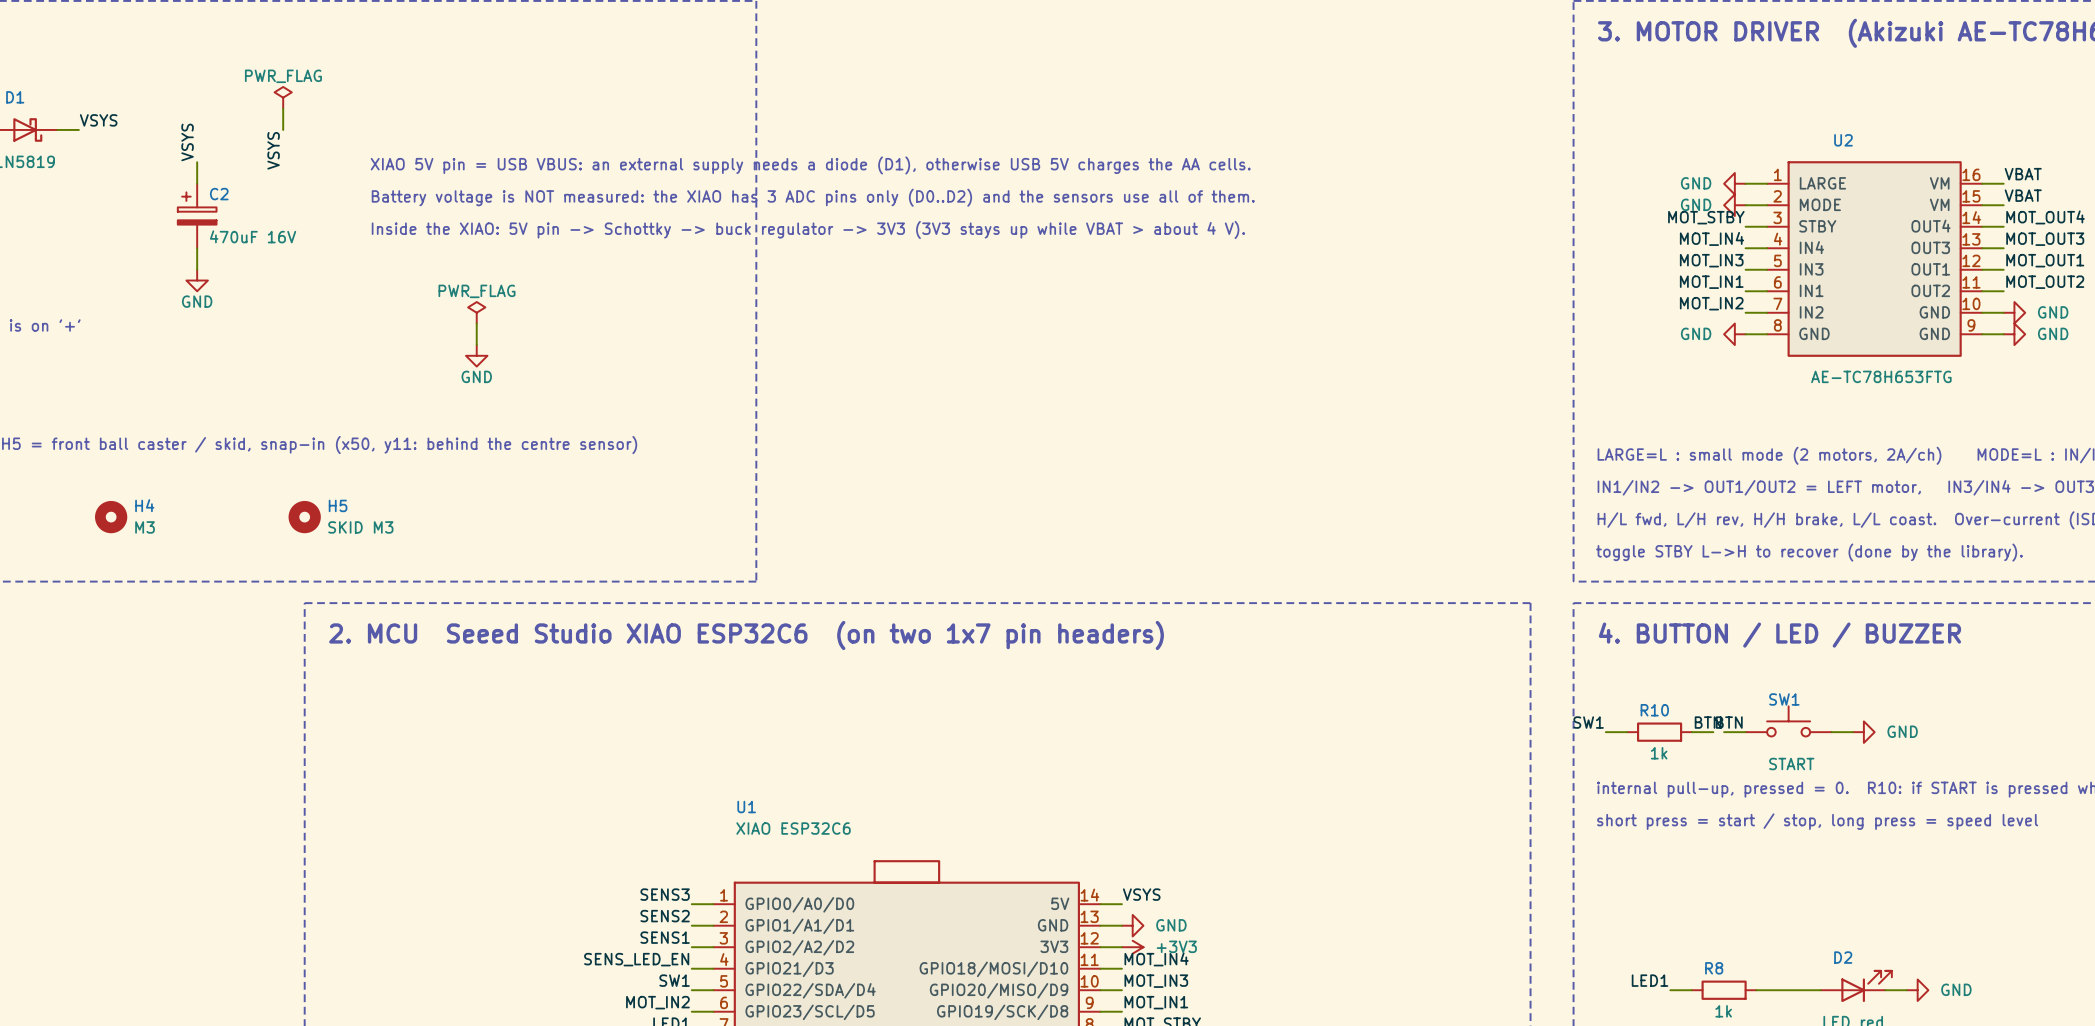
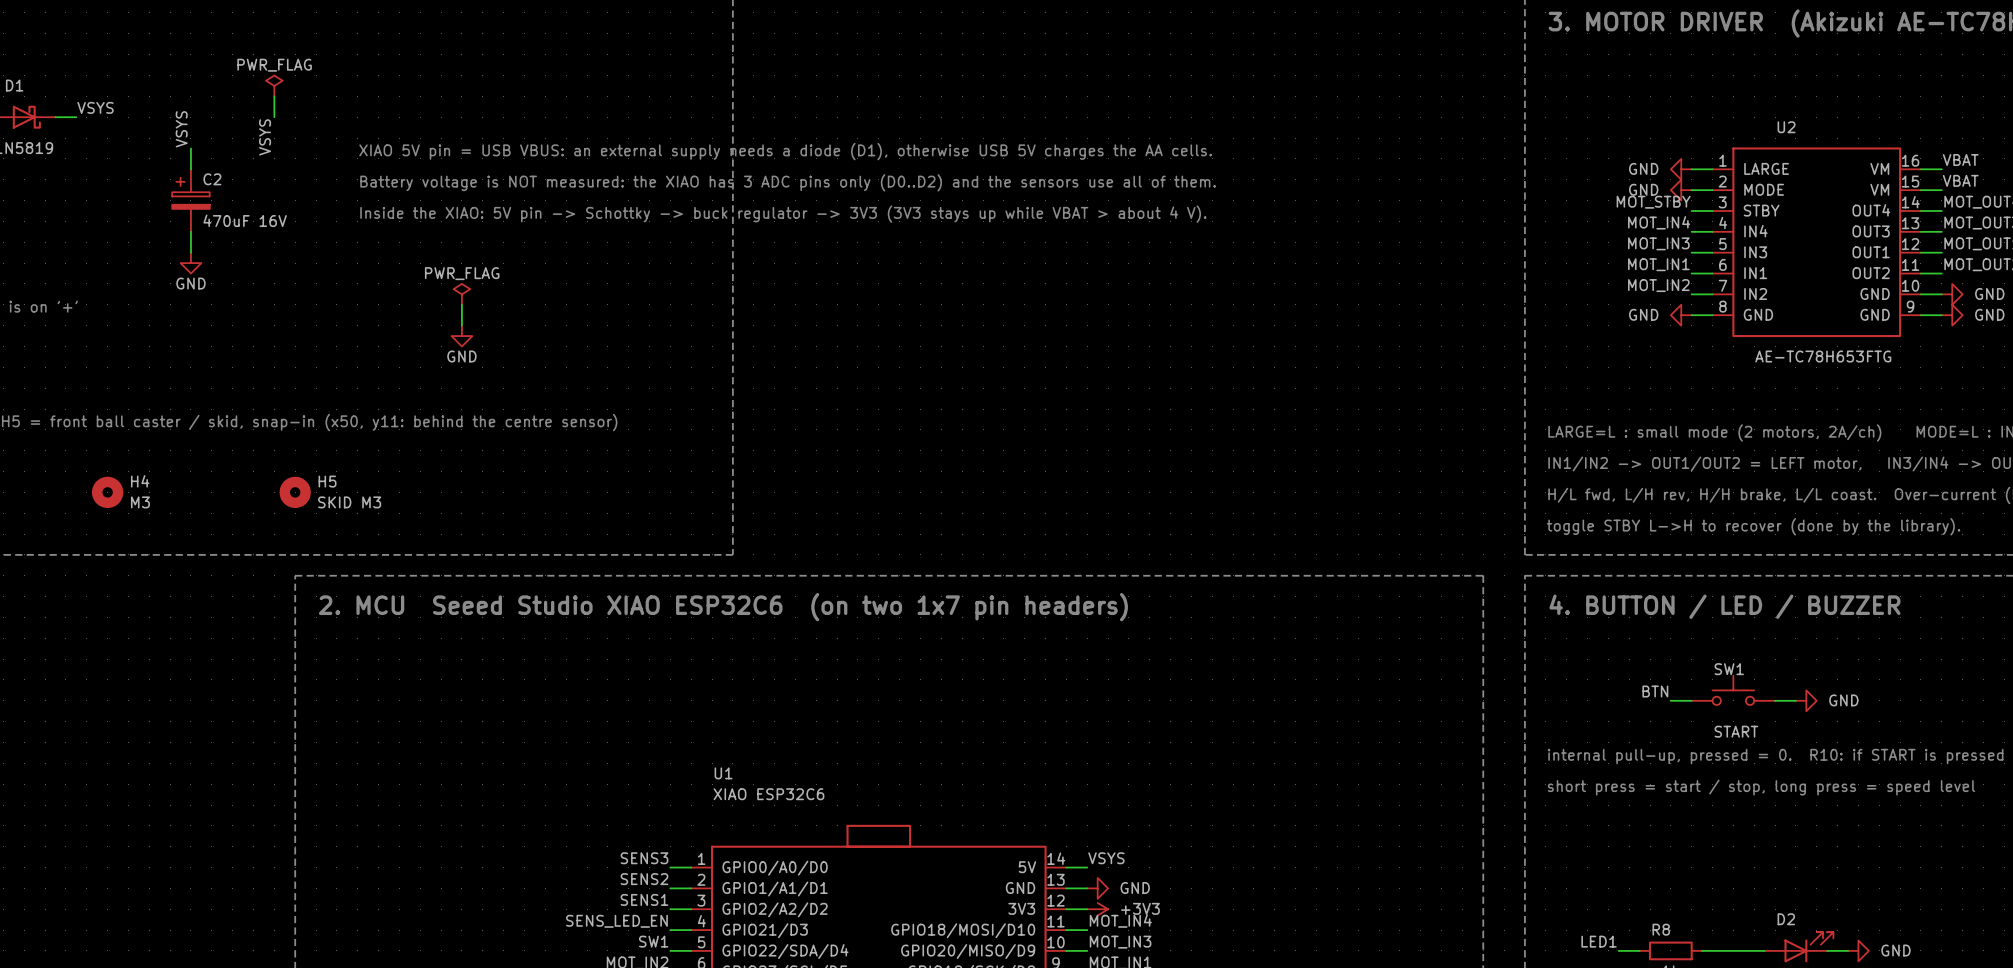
label: SW1 (1588, 722) -> none
label: BTN (1729, 722) -> none
wire: (1605, 732) (1627, 732) -> none
R10: 1k (1659, 732) -> none
wire: (1691, 732) (1713, 732) -> none

